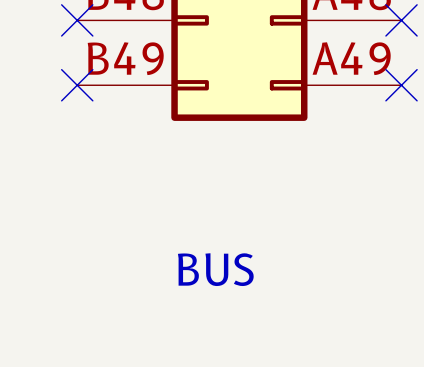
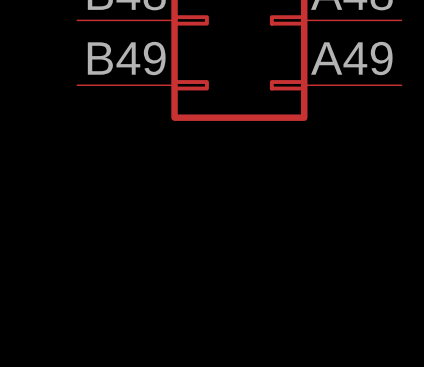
no-connect mark: (77, 20) -> none
no-connect mark: (401, 20) -> none
no-connect mark: (77, 85) -> none
no-connect mark: (401, 85) -> none
text: BUS (215, 269) -> none

